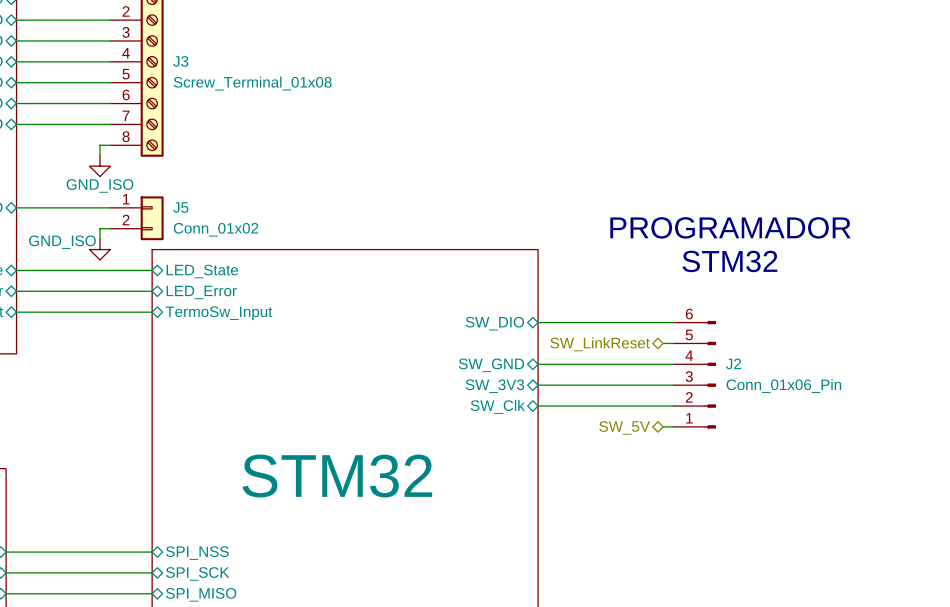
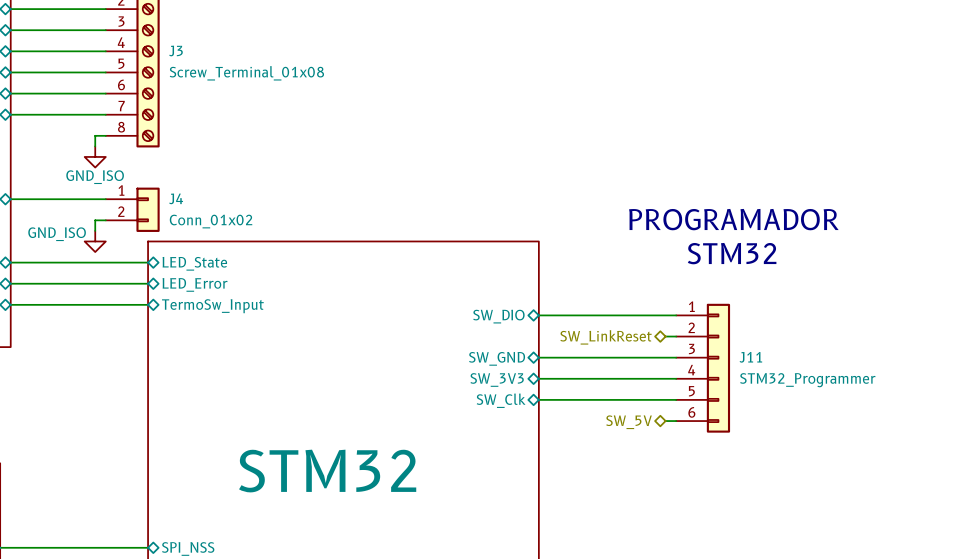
J5 name: J5 (180, 207) -> J4 (176, 198)
J2: Conn_01x06_Pin (694, 374) -> none
J11: none -> STM32_Programmer (703, 368)

